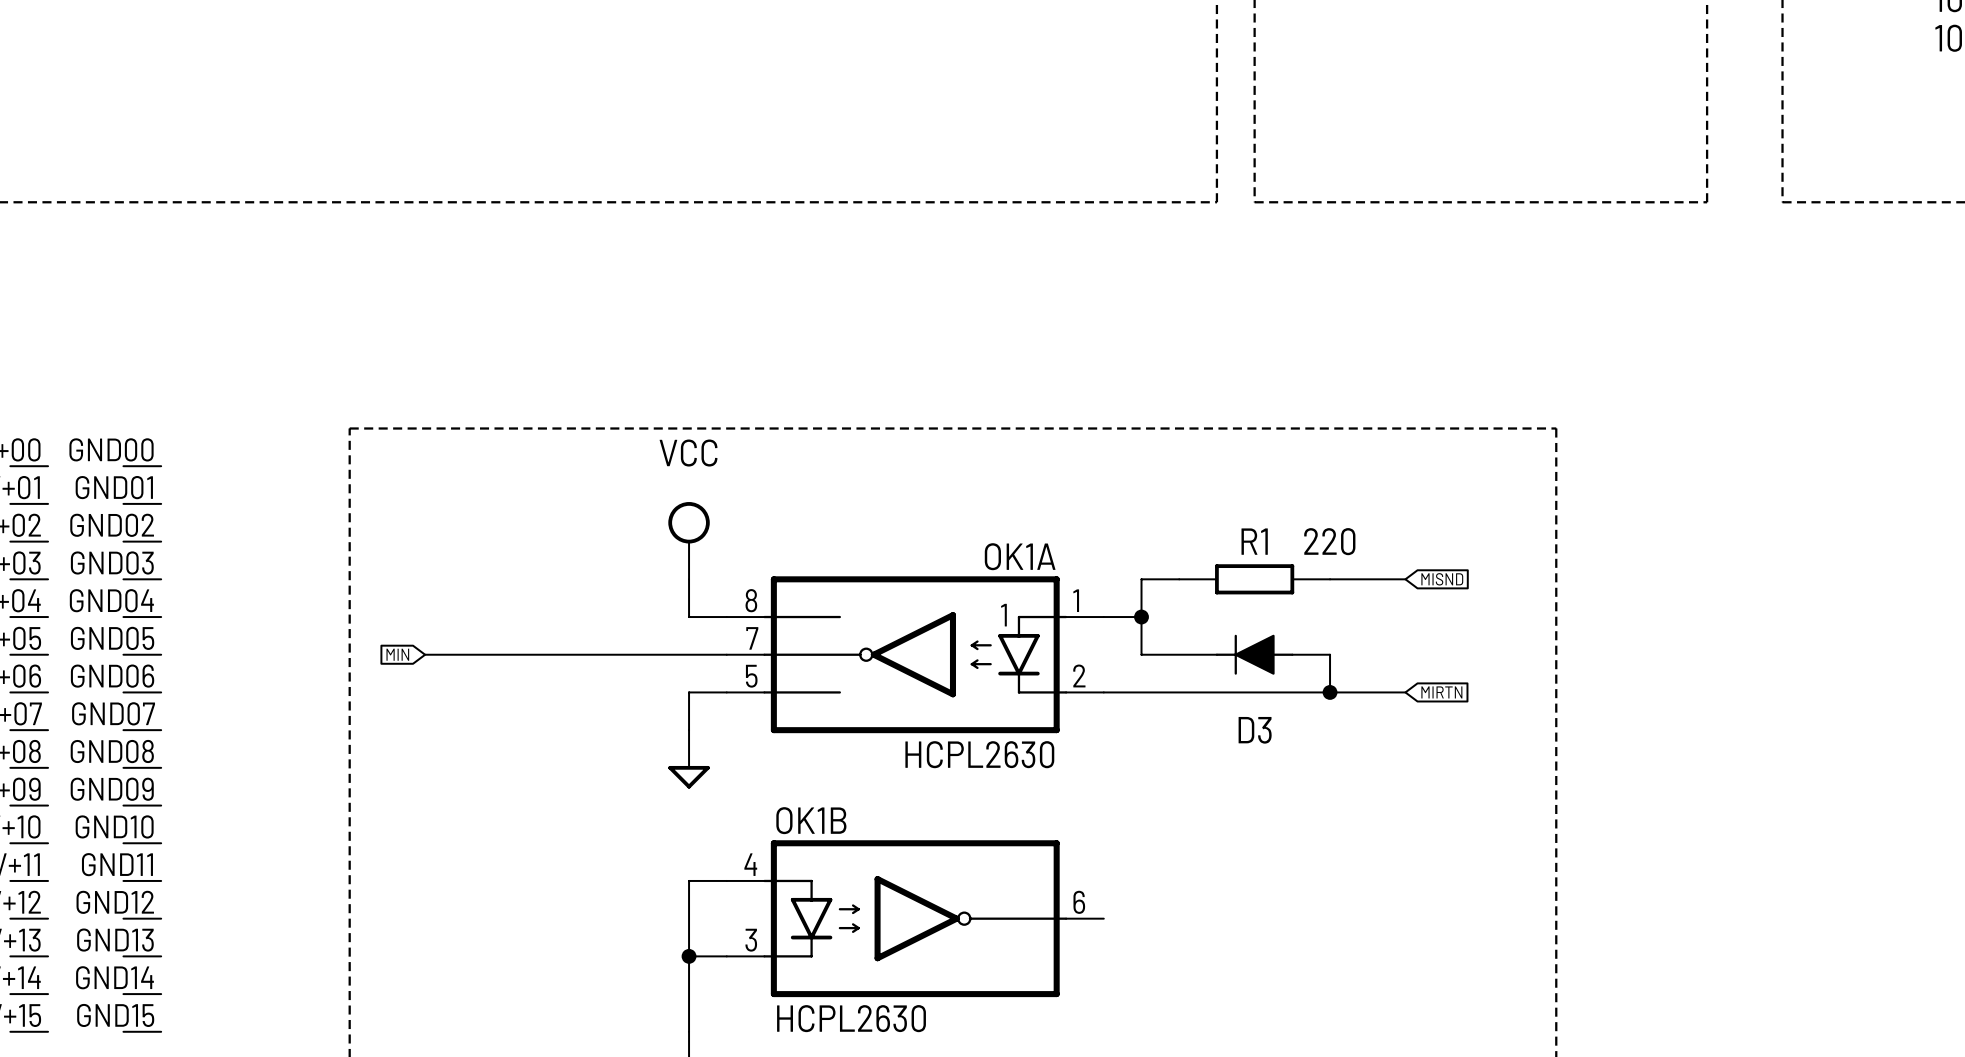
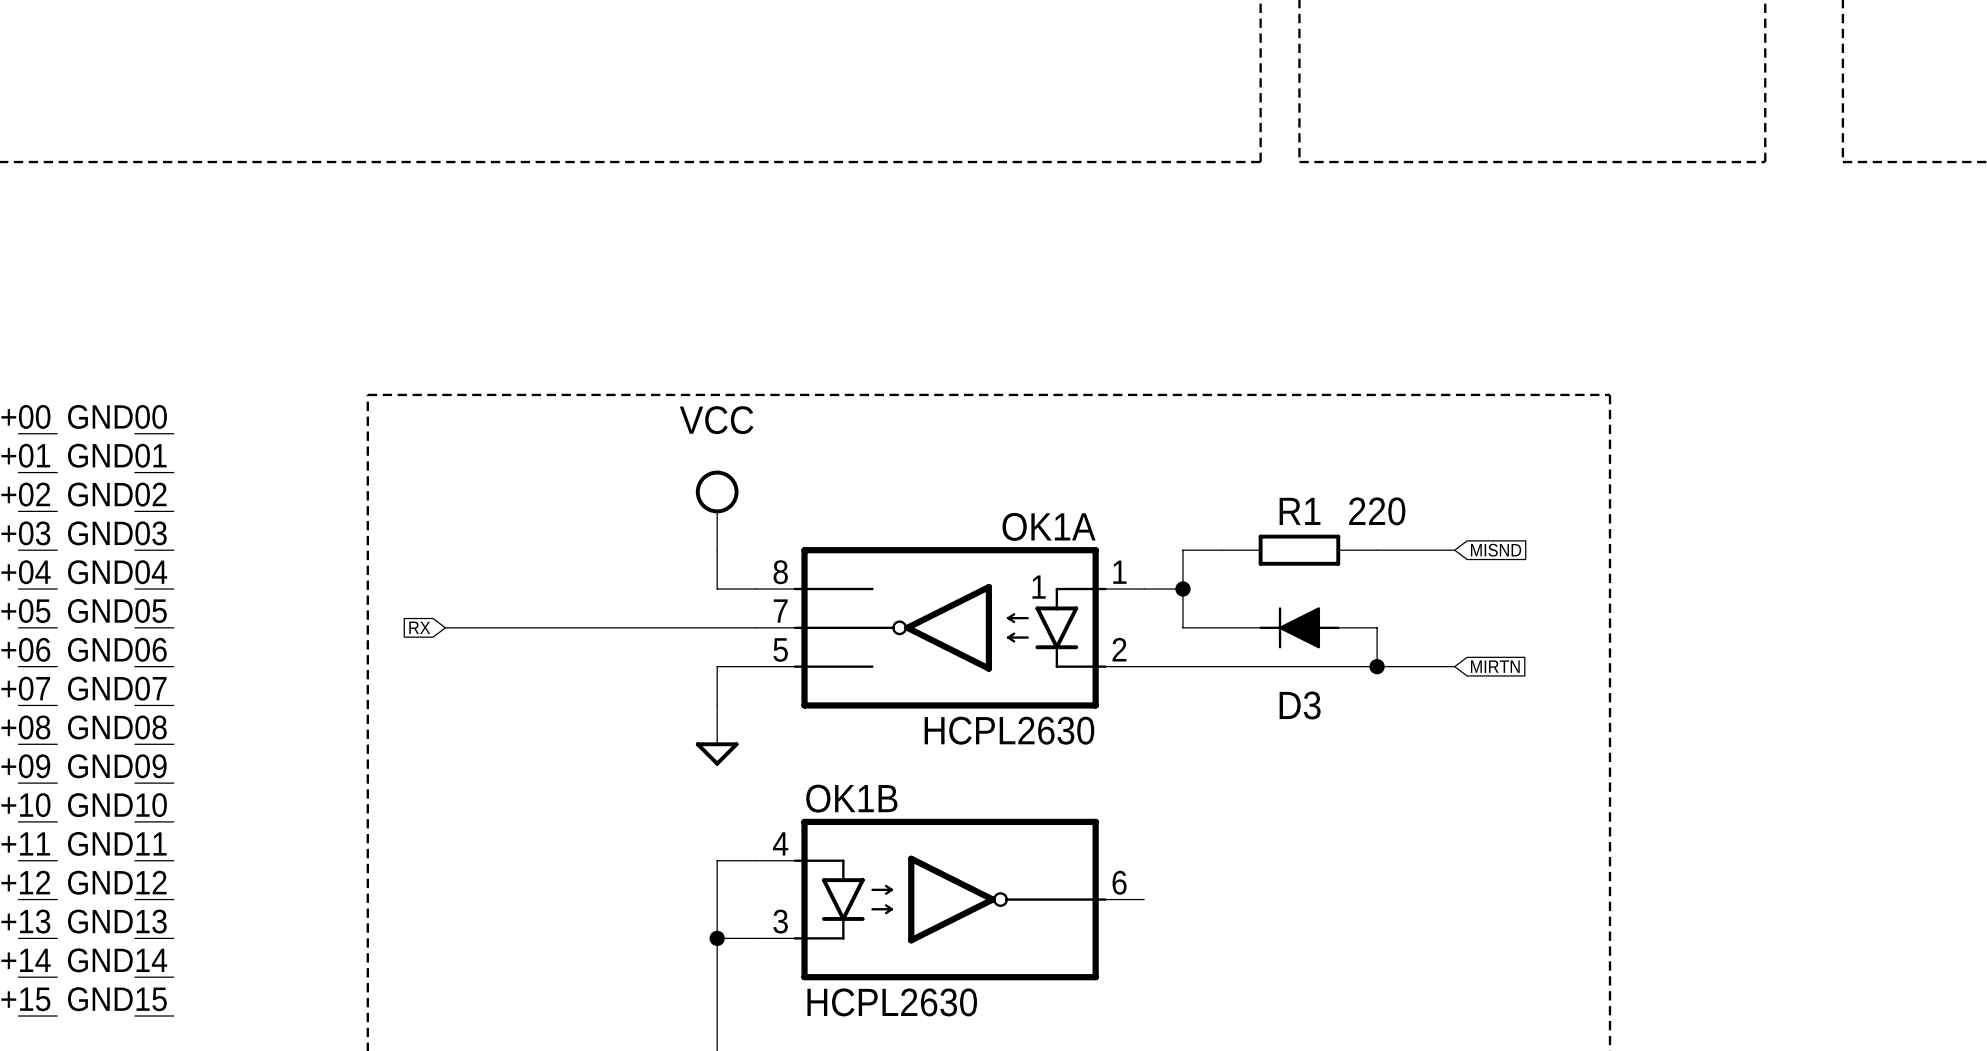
global label: MIN (397, 654) -> RX (419, 627)

